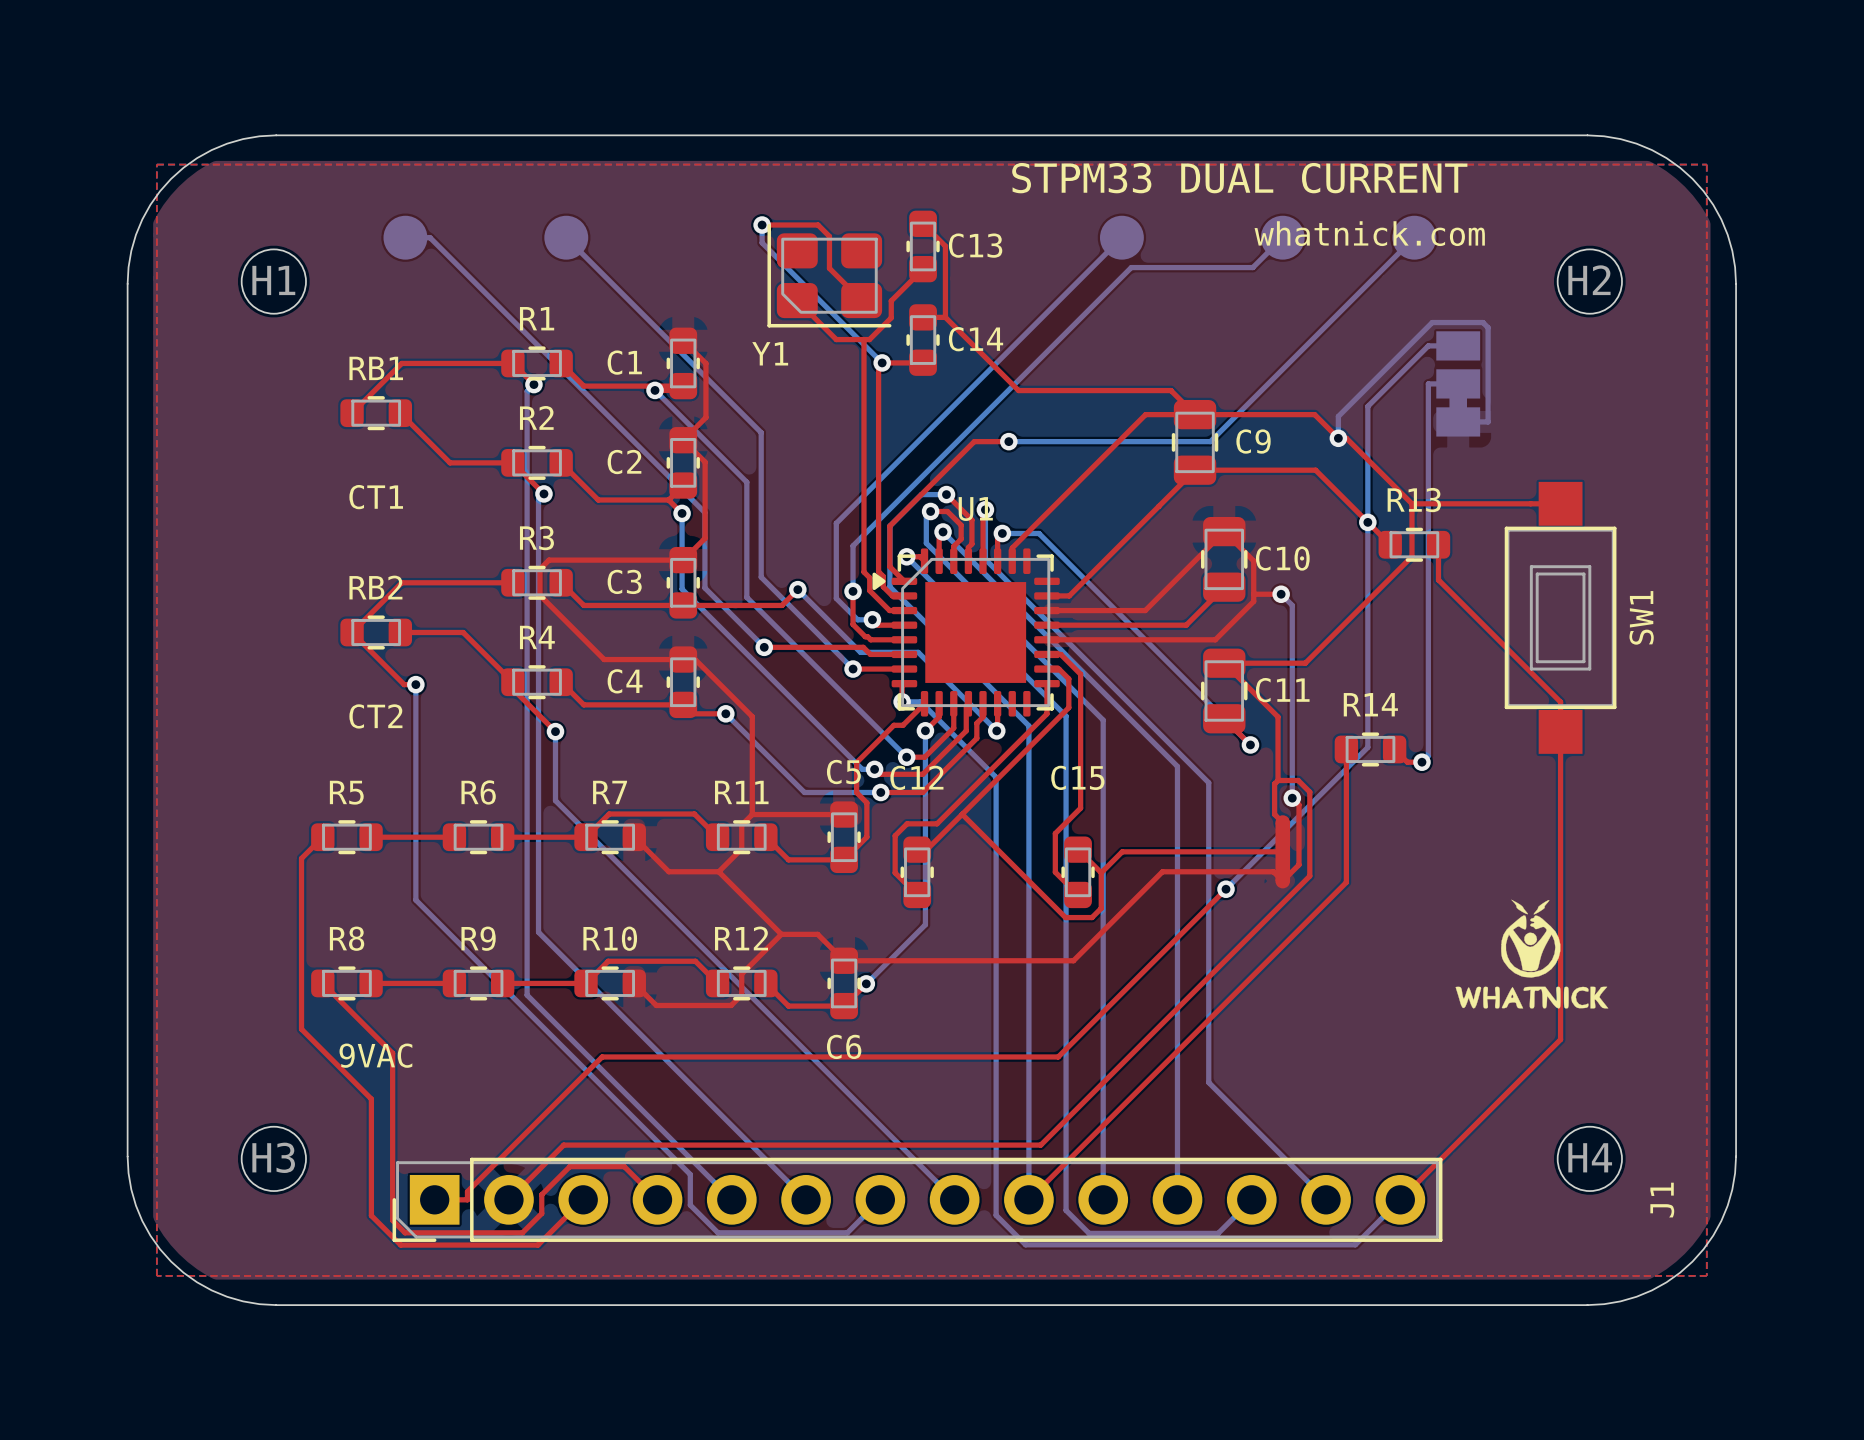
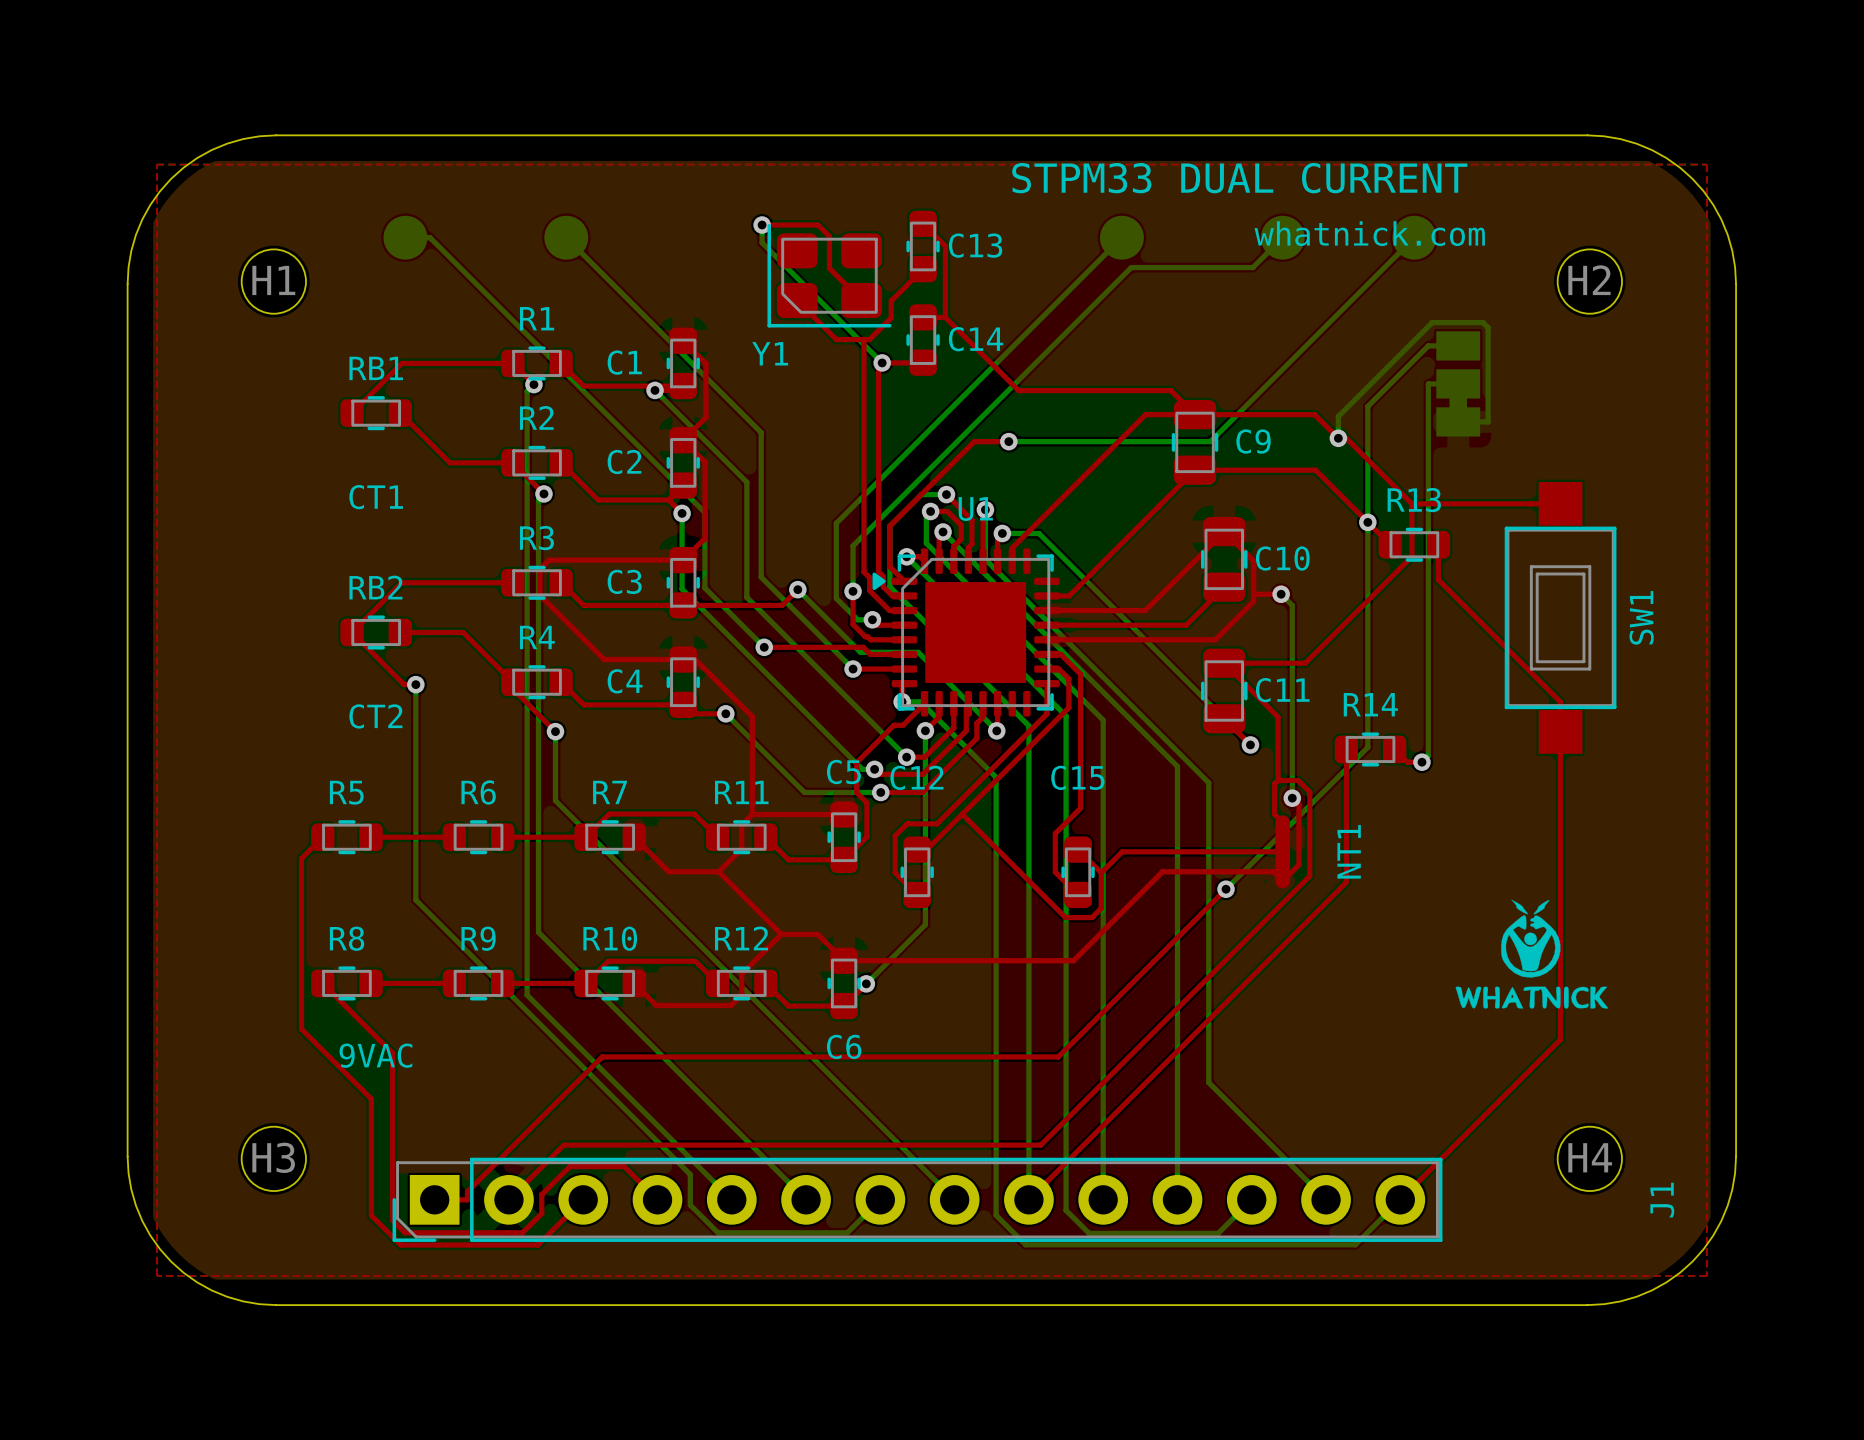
NT1 name: none -> NT1 (1349, 851)

